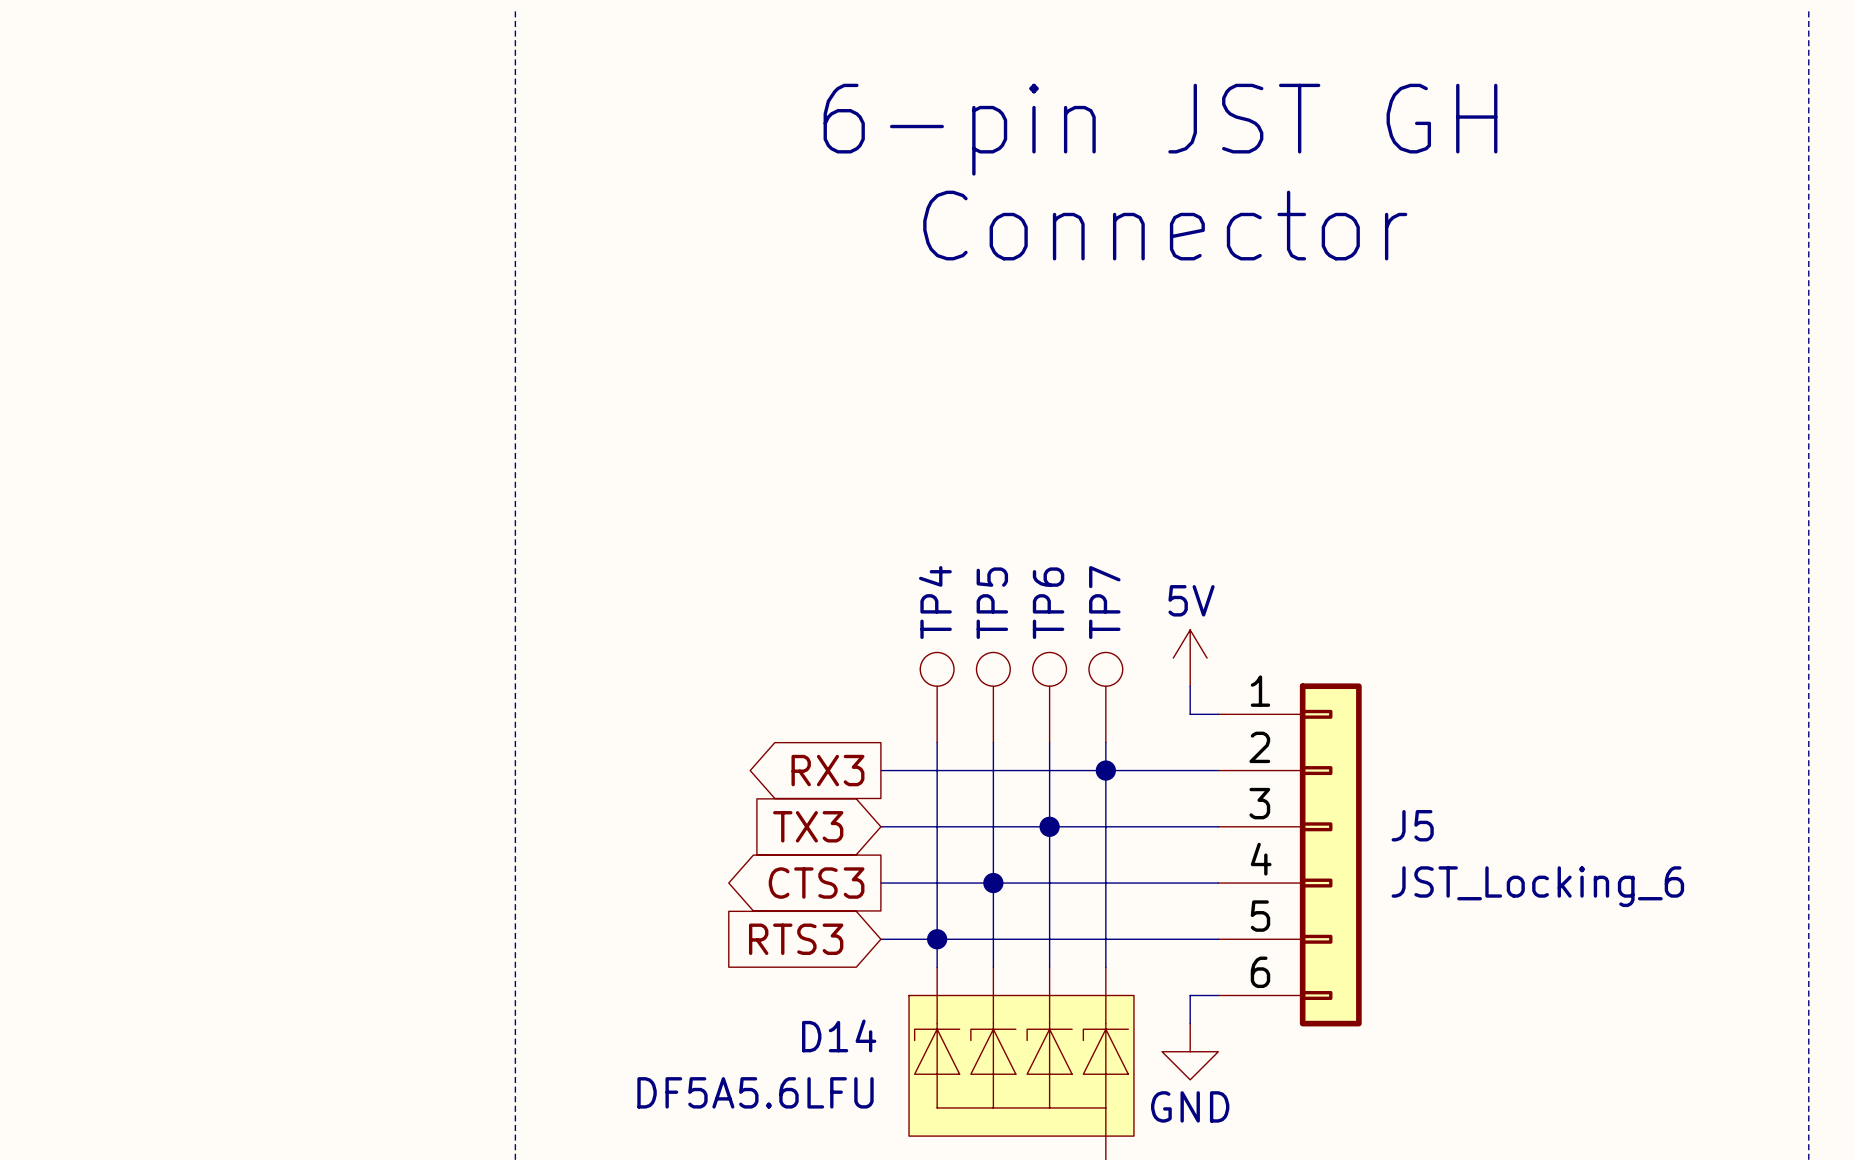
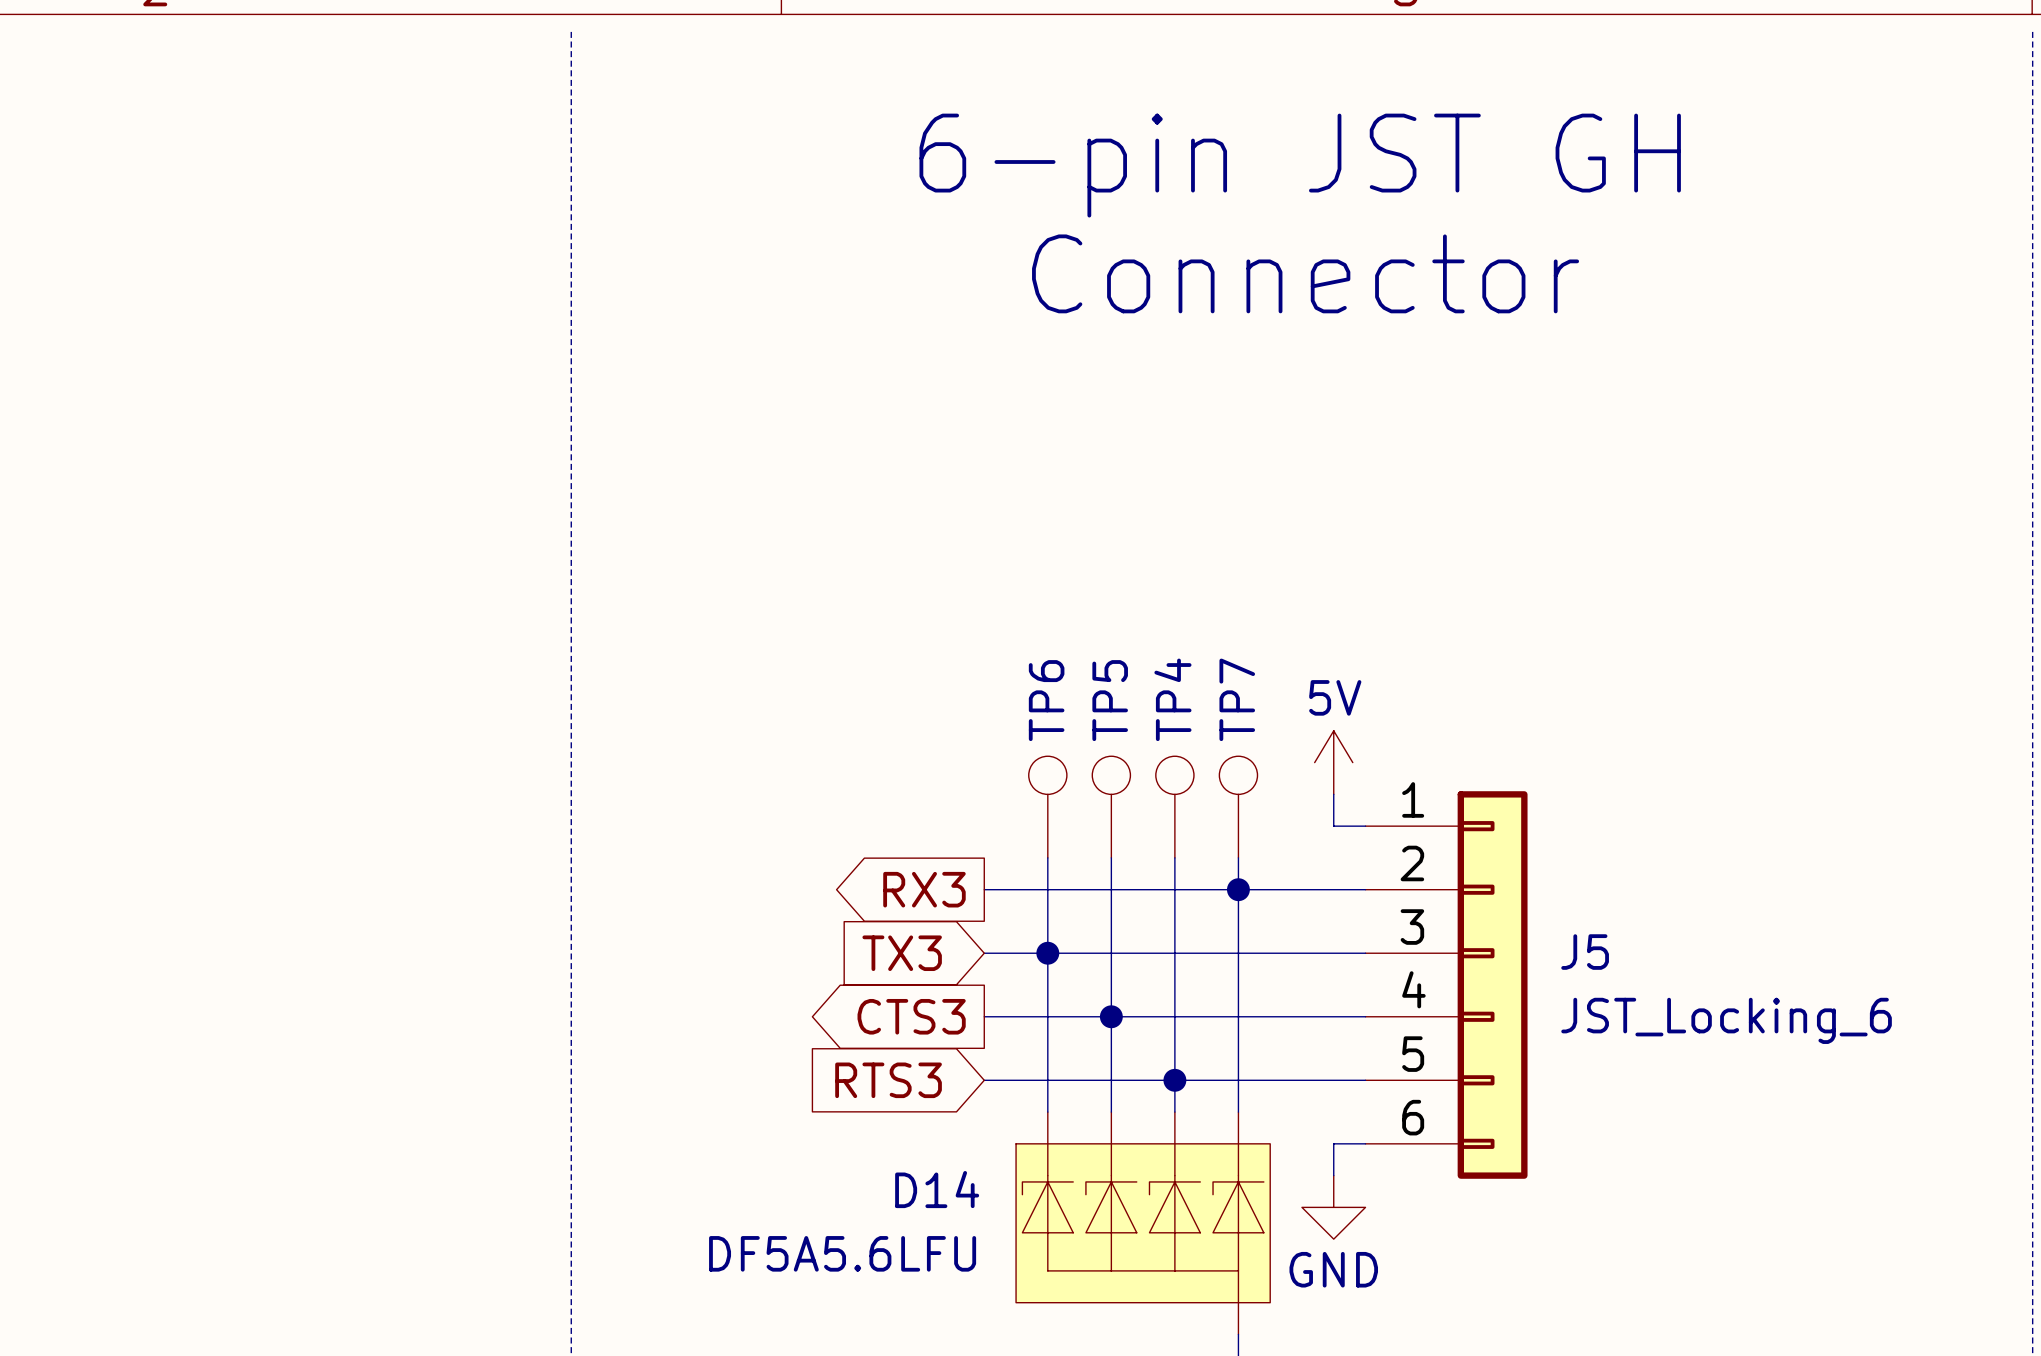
TP4 name: TP4 (935, 602) -> TP6 (1046, 700)
TP6 name: TP6 (1048, 603) -> TP4 (1172, 699)
junction: none -> (1047, 953)
junction: (1049, 826) -> none
junction: (937, 939) -> none
junction: none -> (1174, 1080)

